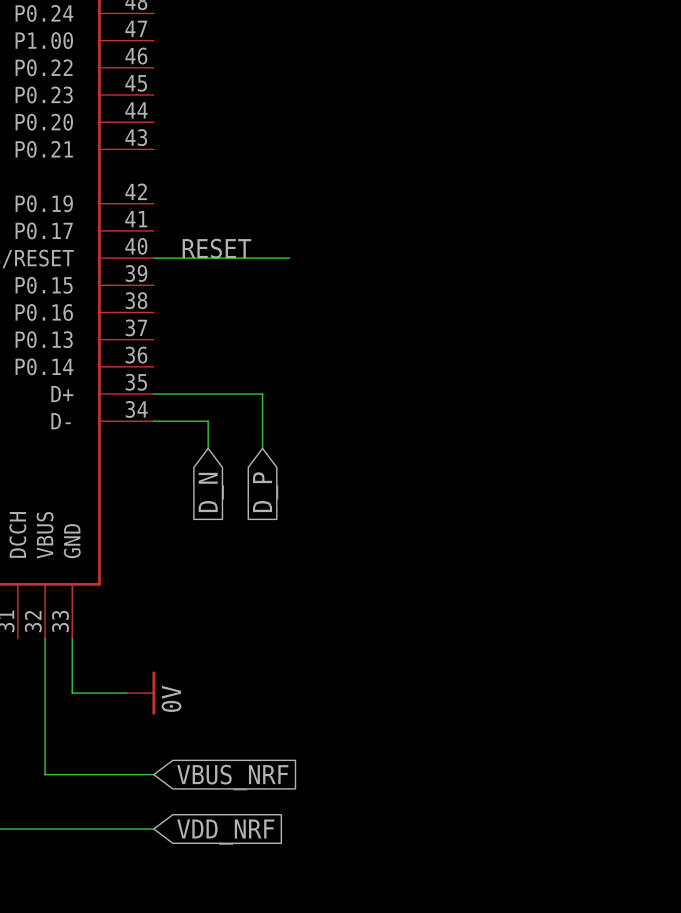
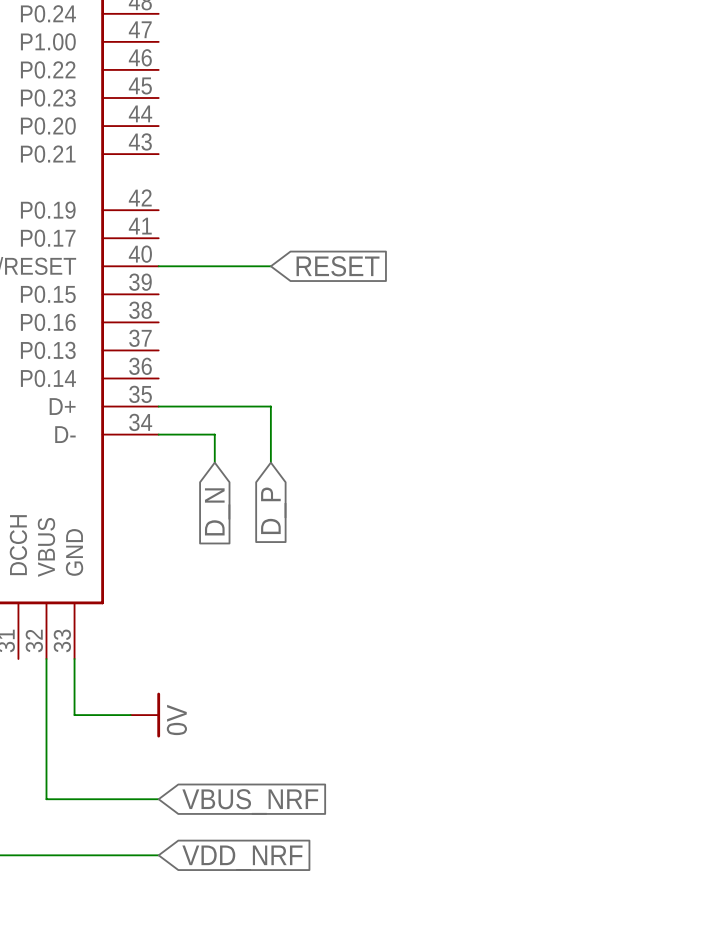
label: RESET (216, 248) -> none
wire: (262, 258) (289, 258) -> none
global label: none -> RESET (338, 266)

